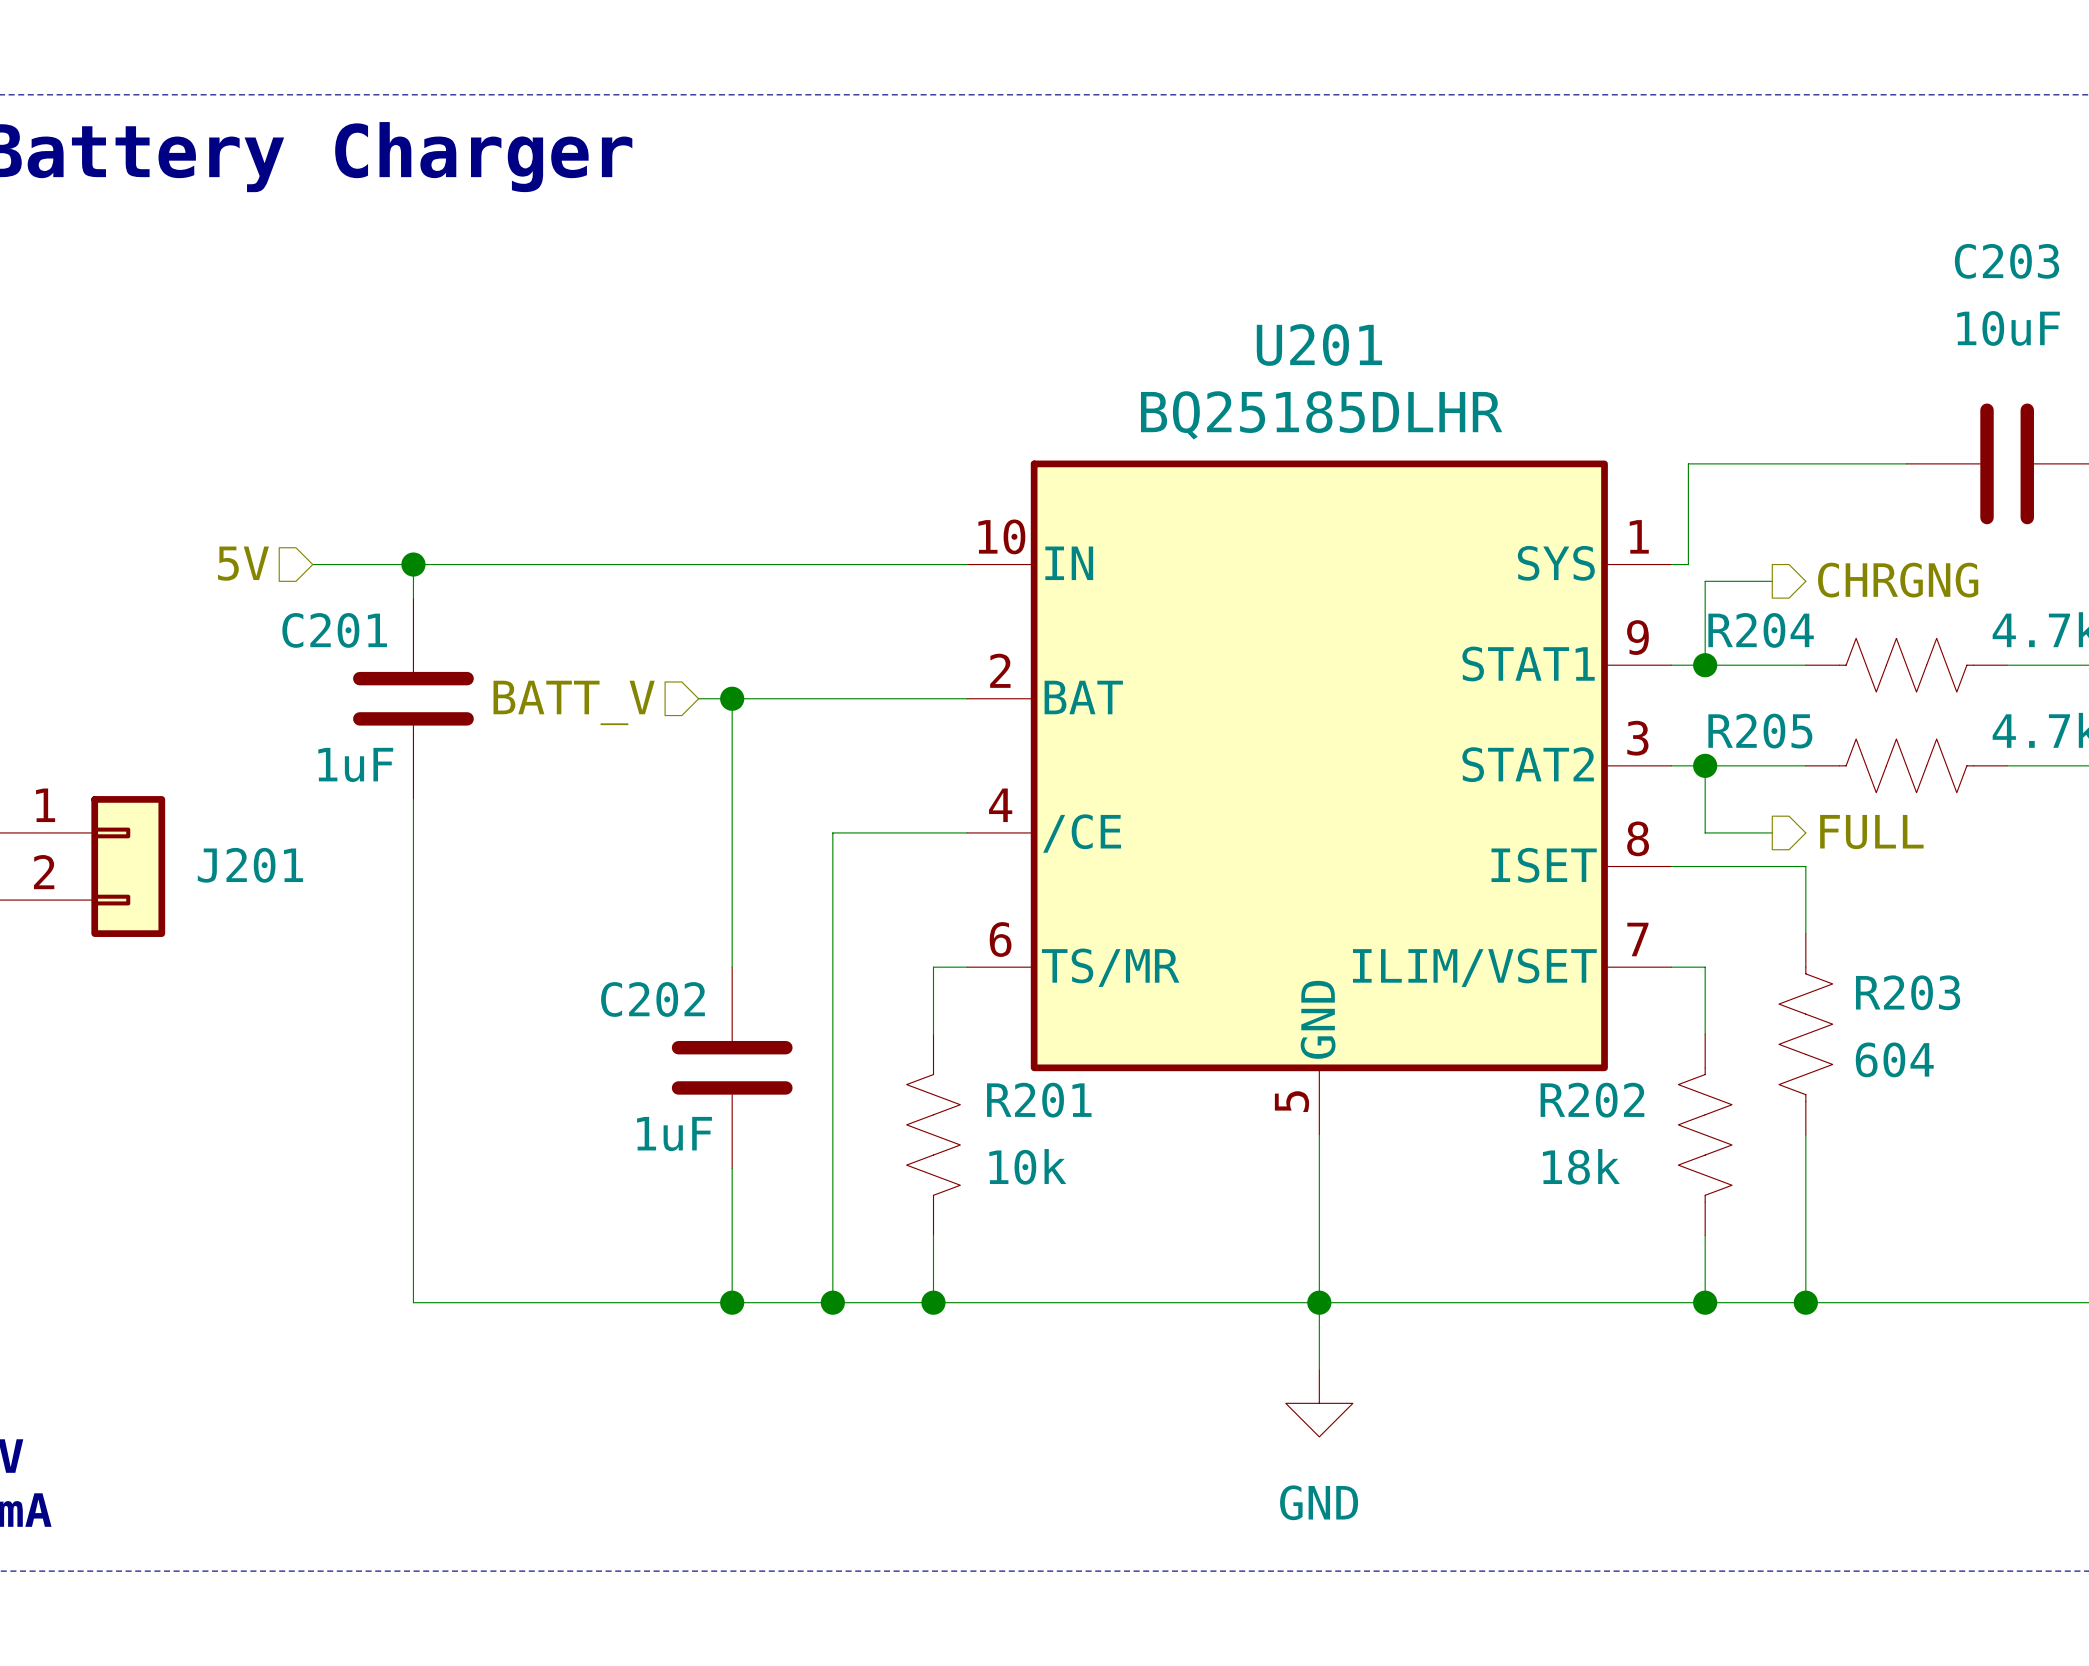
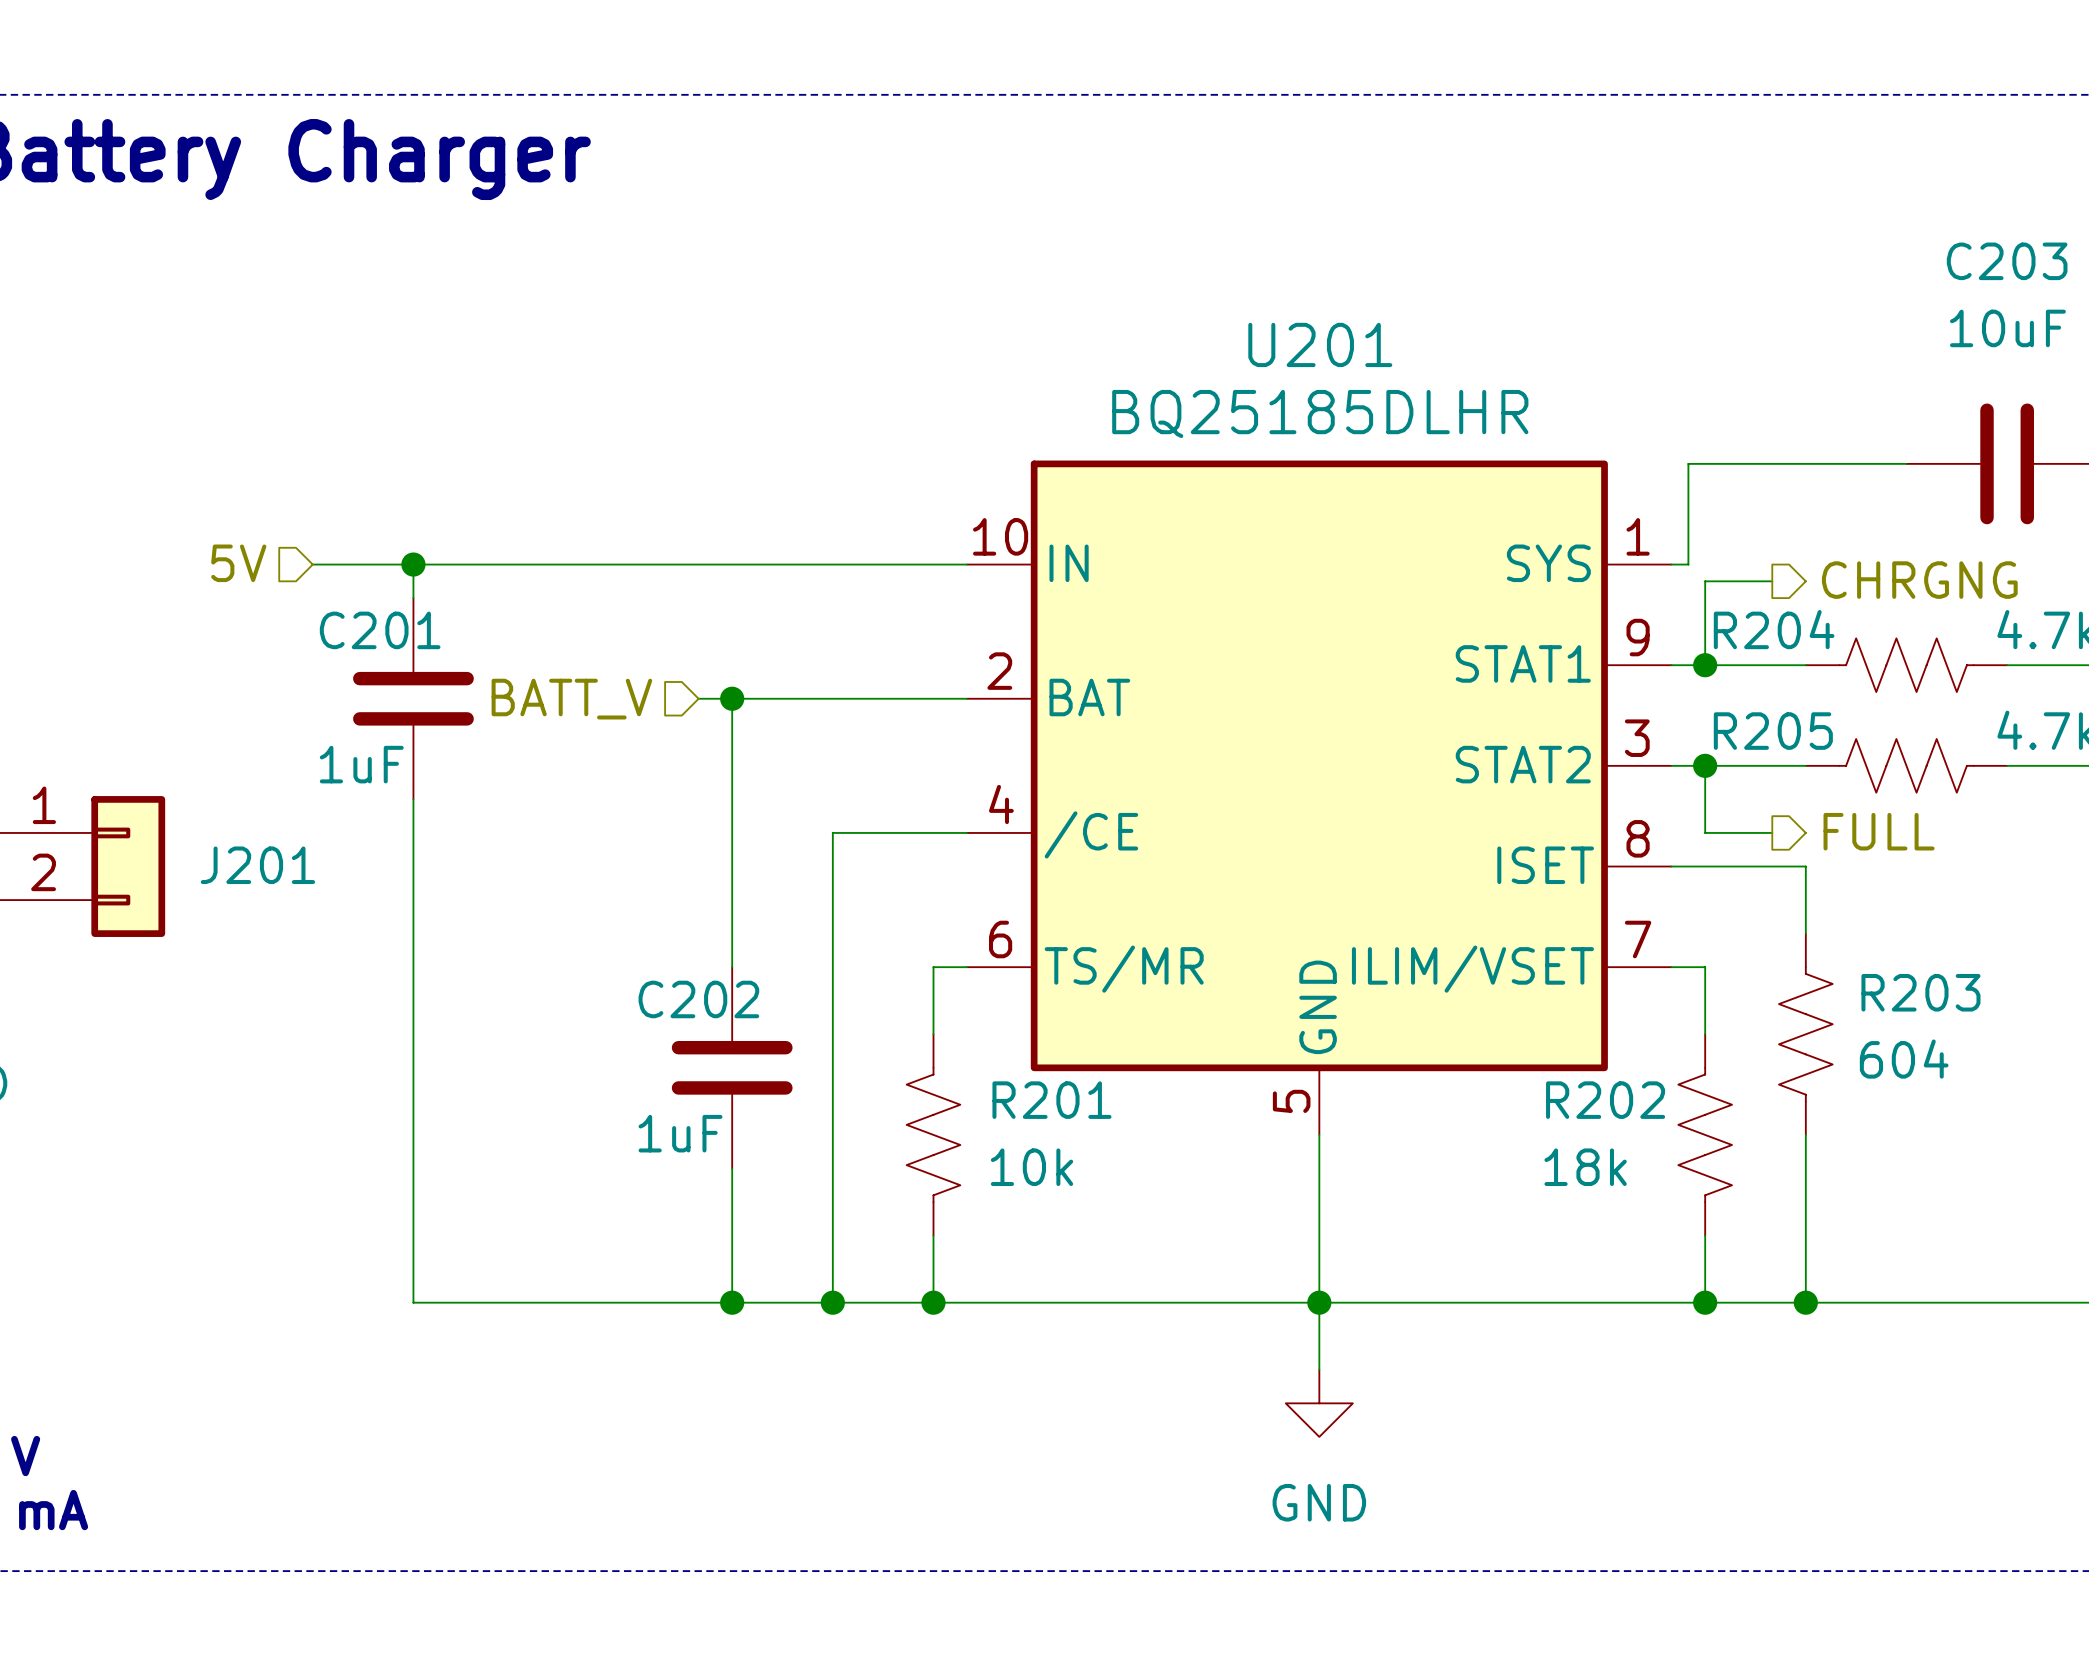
C201 name position: C201 (334, 630) -> C201 (380, 630)
C202 name position: C202 (652, 999) -> C202 (698, 999)

